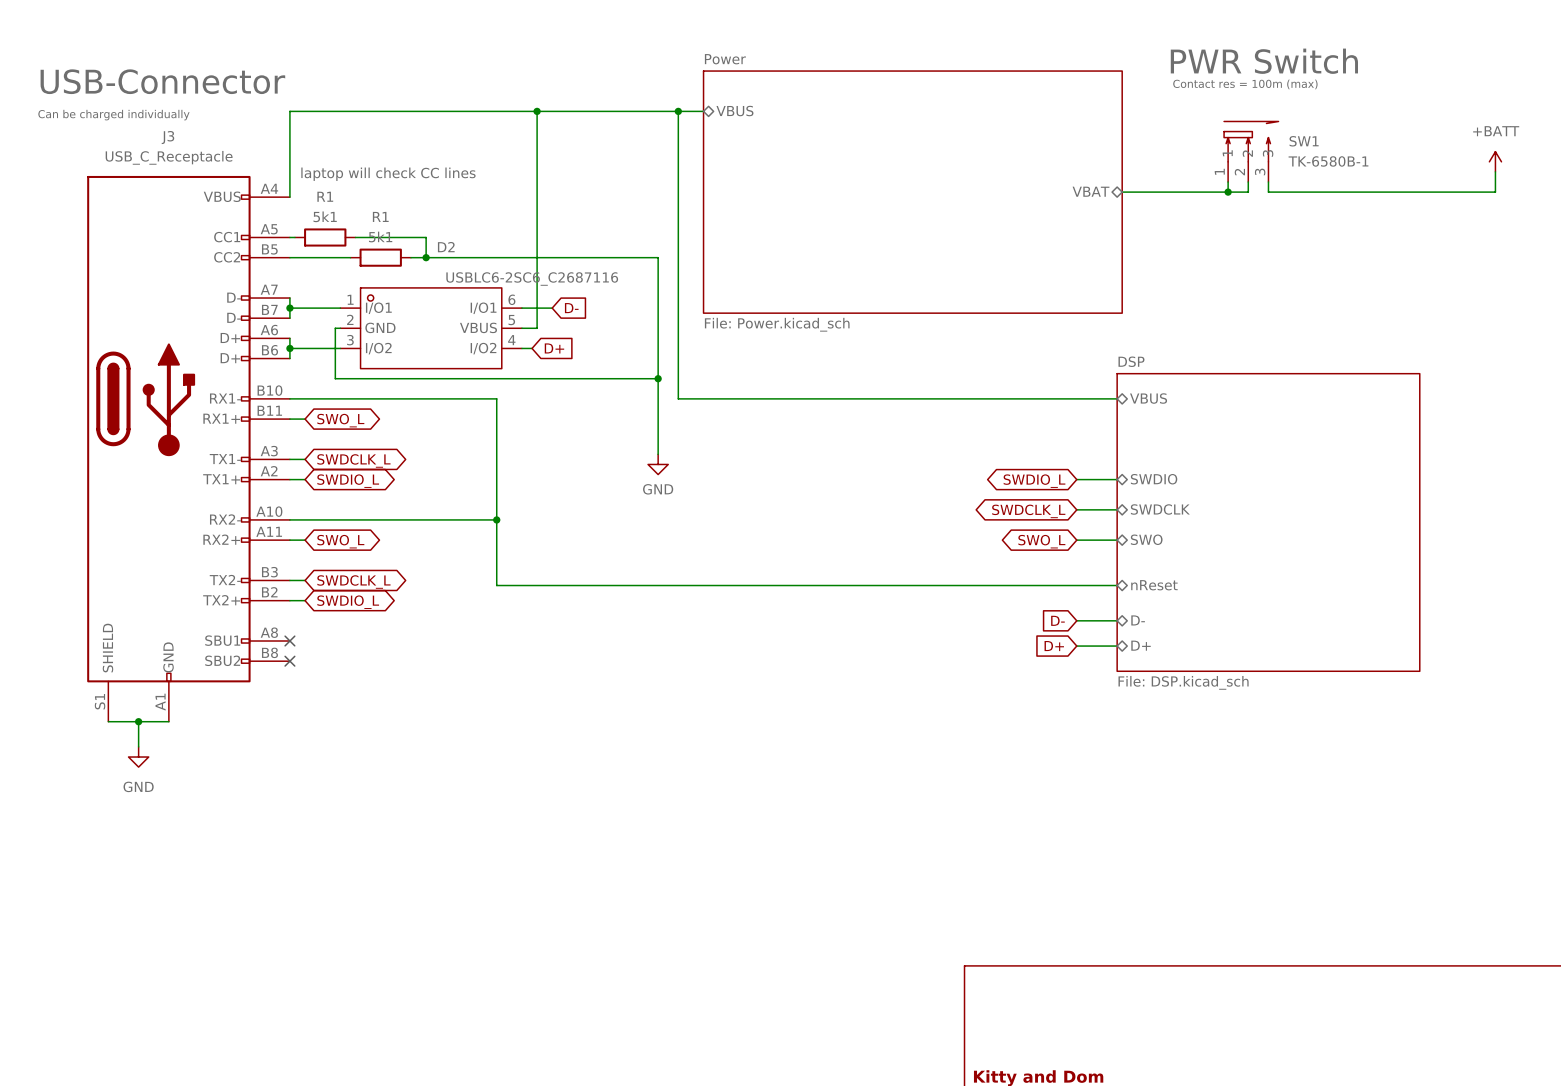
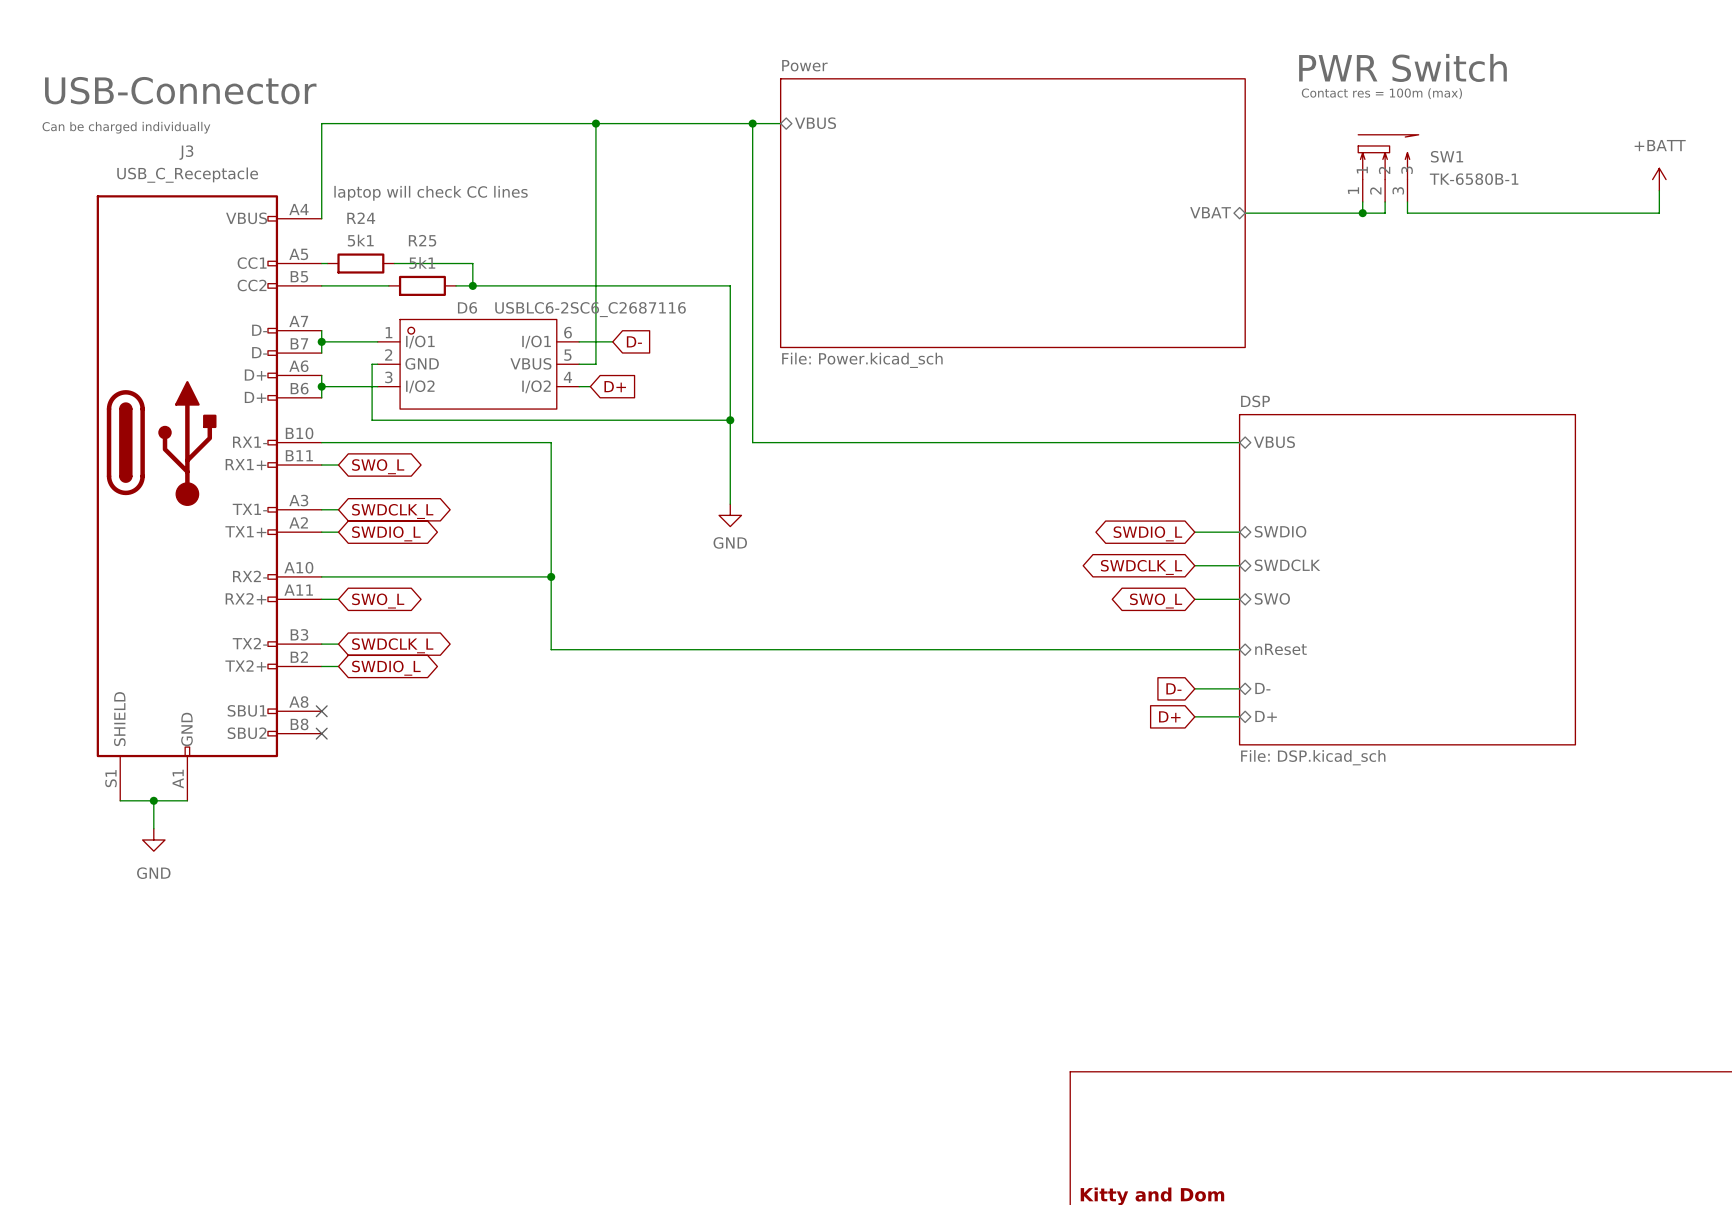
R1 name: R1 (325, 196) -> R24 (361, 218)
R1 name: R1 (380, 216) -> R25 (422, 240)
D2 name: D2 (446, 247) -> D6 (467, 307)

